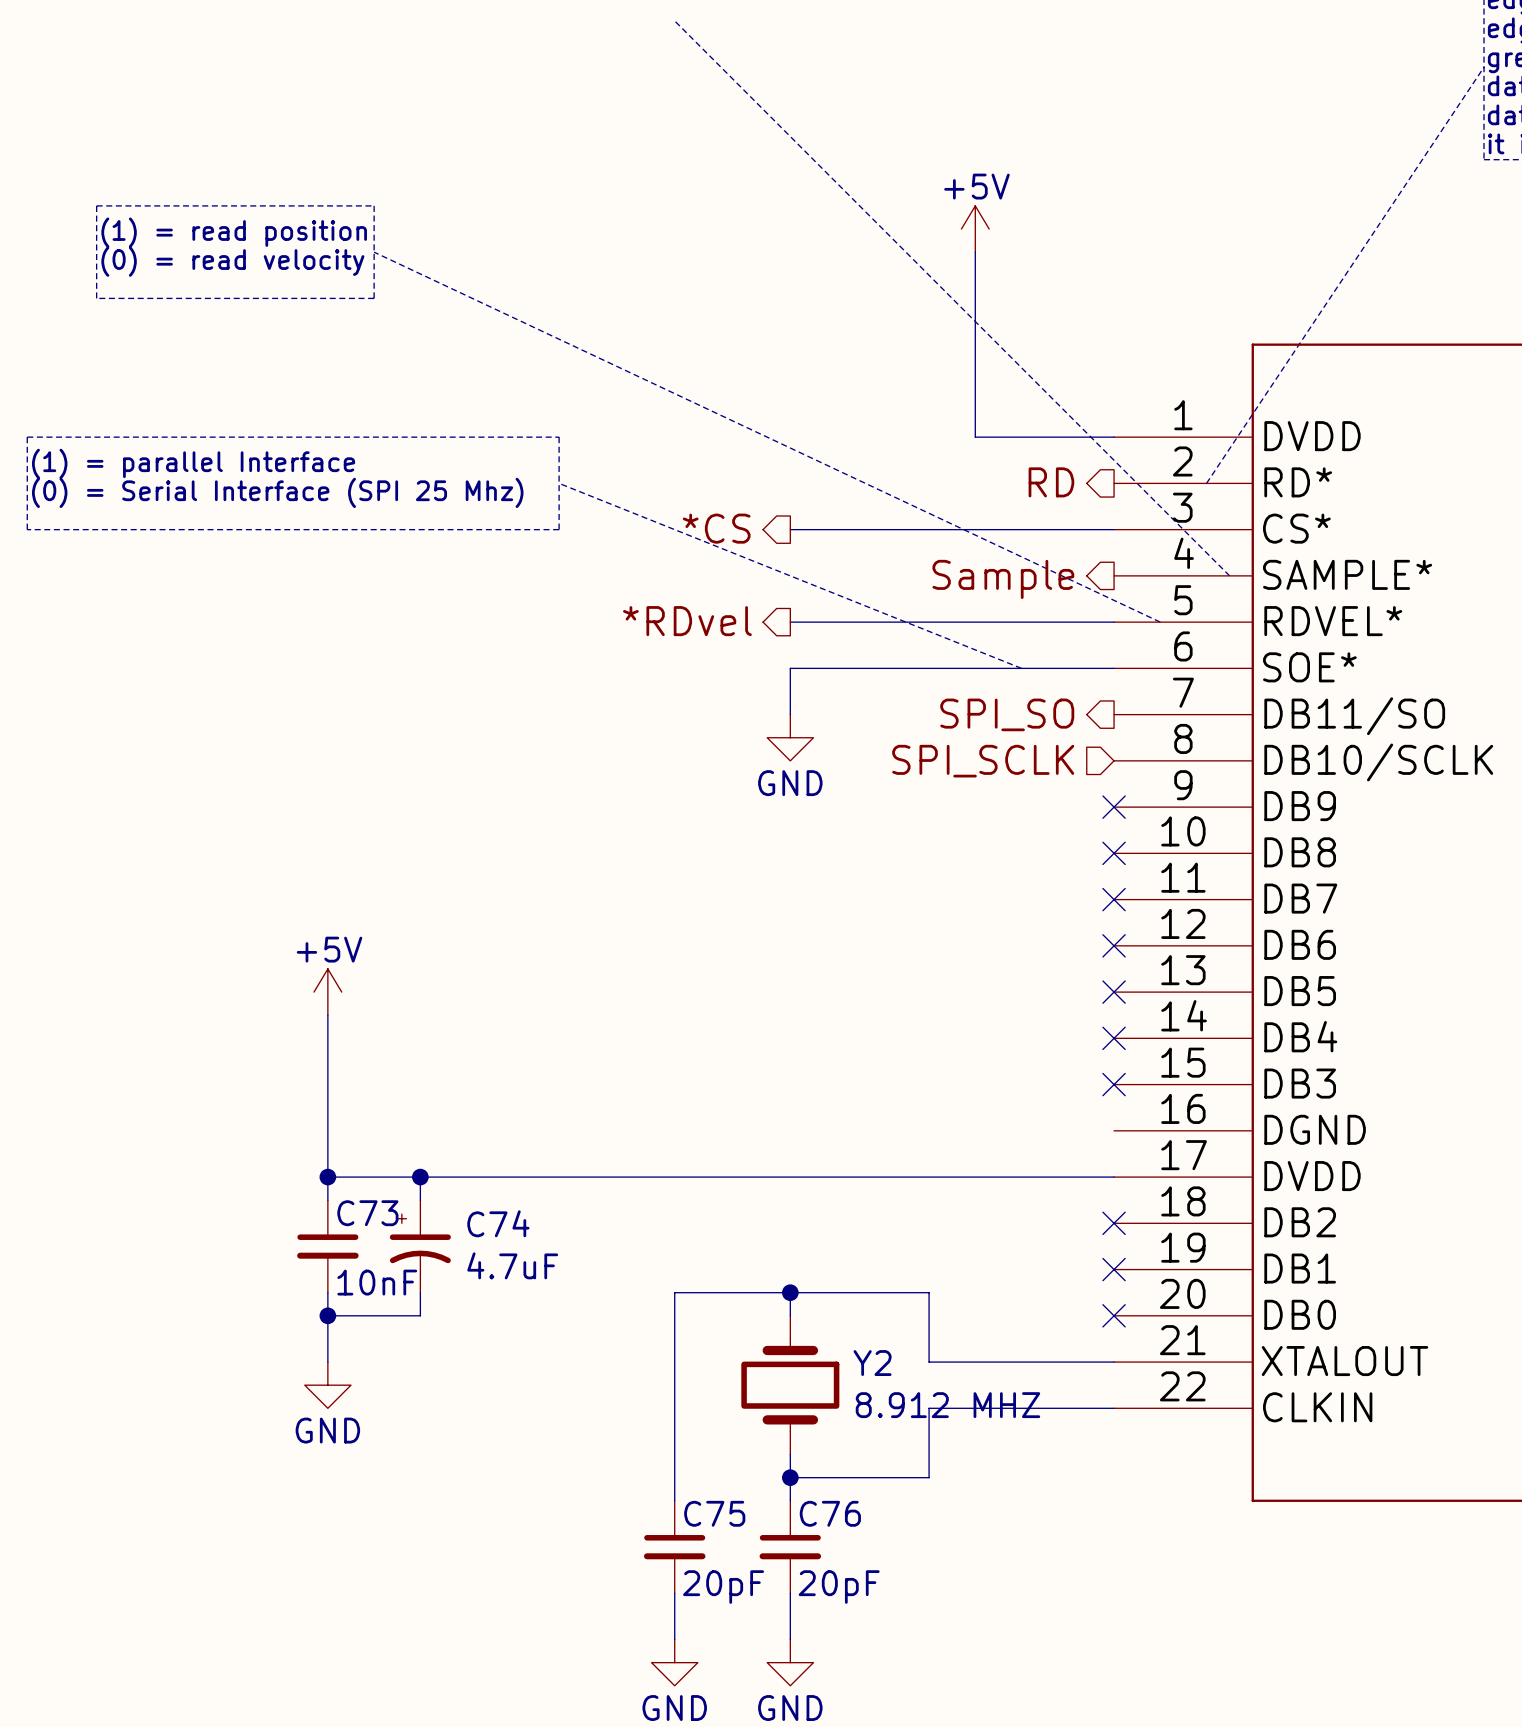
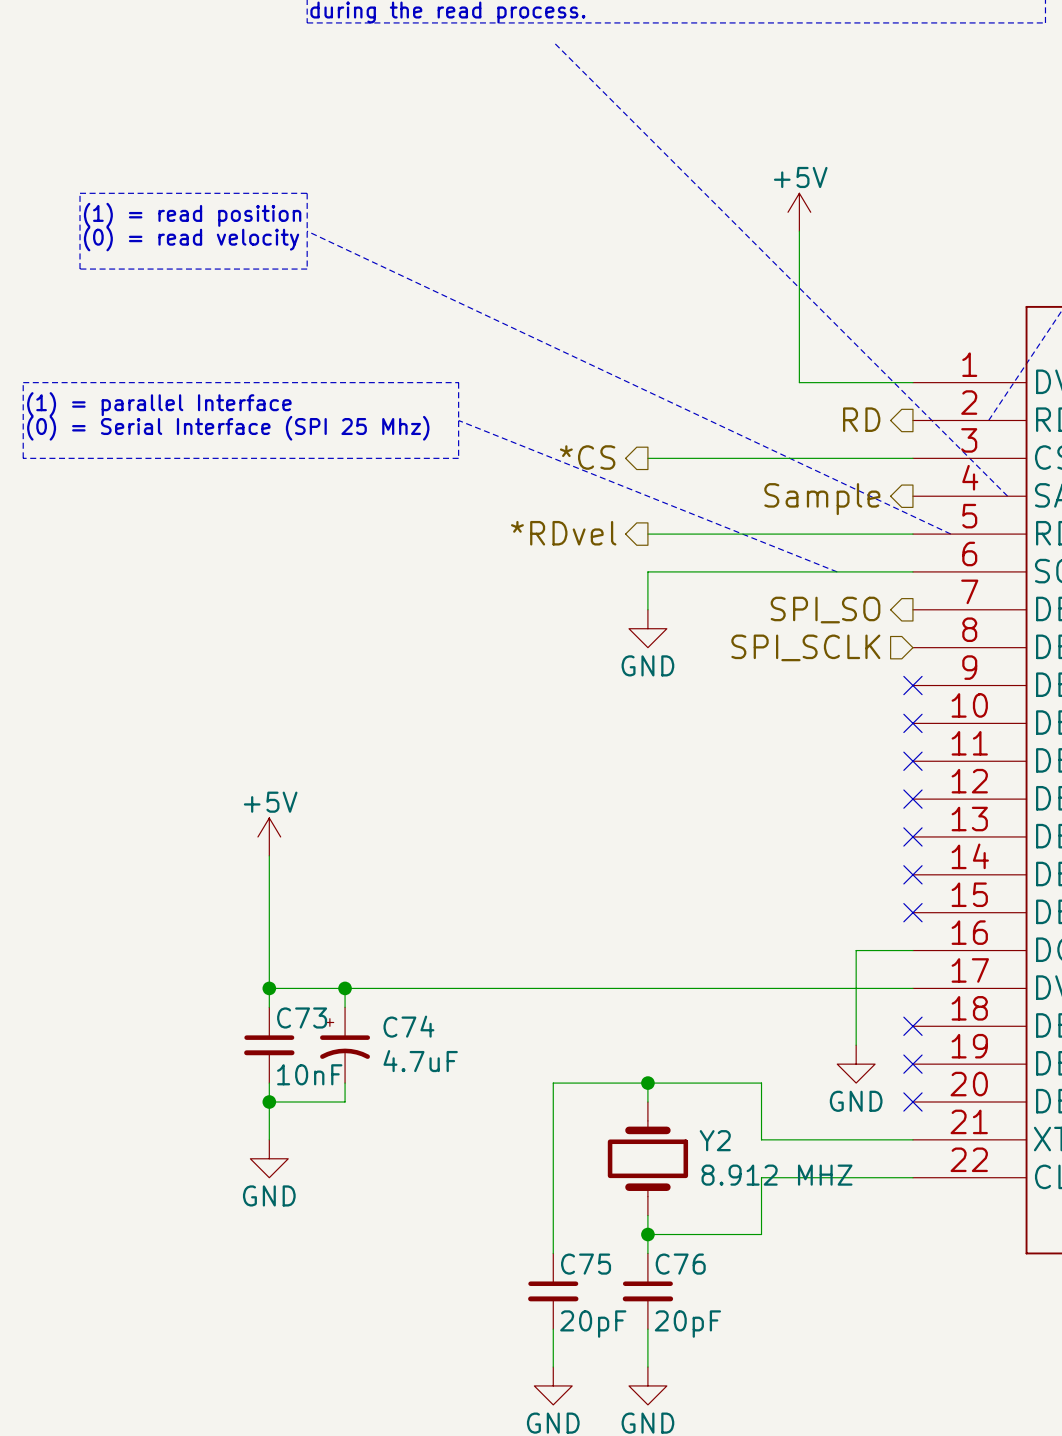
wire: none -> (912, 950) (856, 950) (856, 1045)
power symbol: none -> GND (856, 1064)

